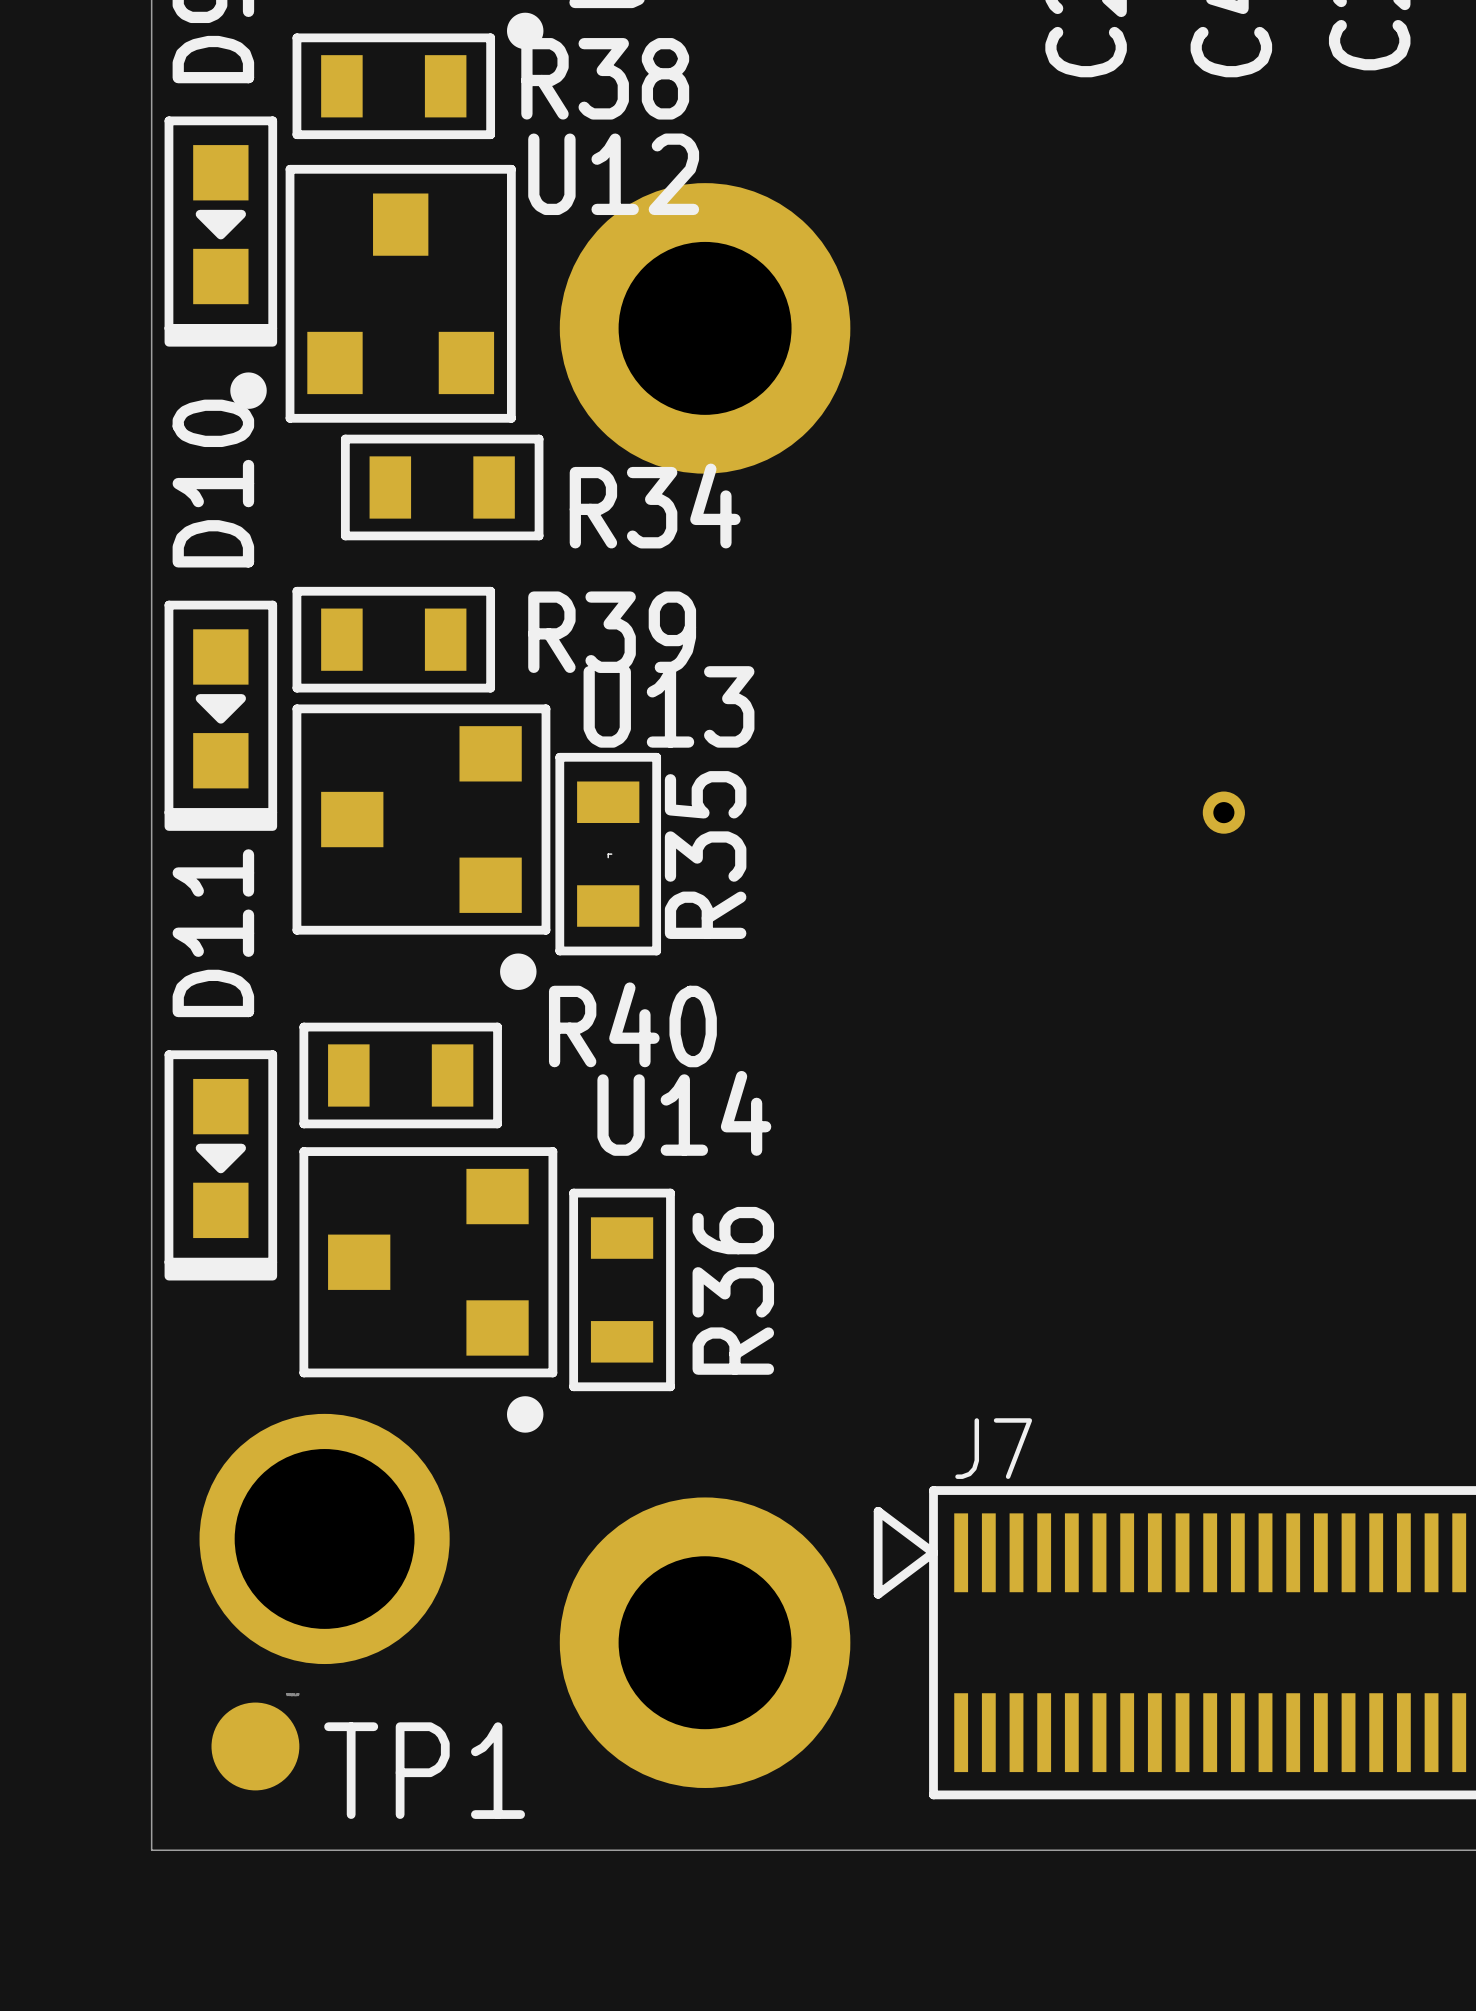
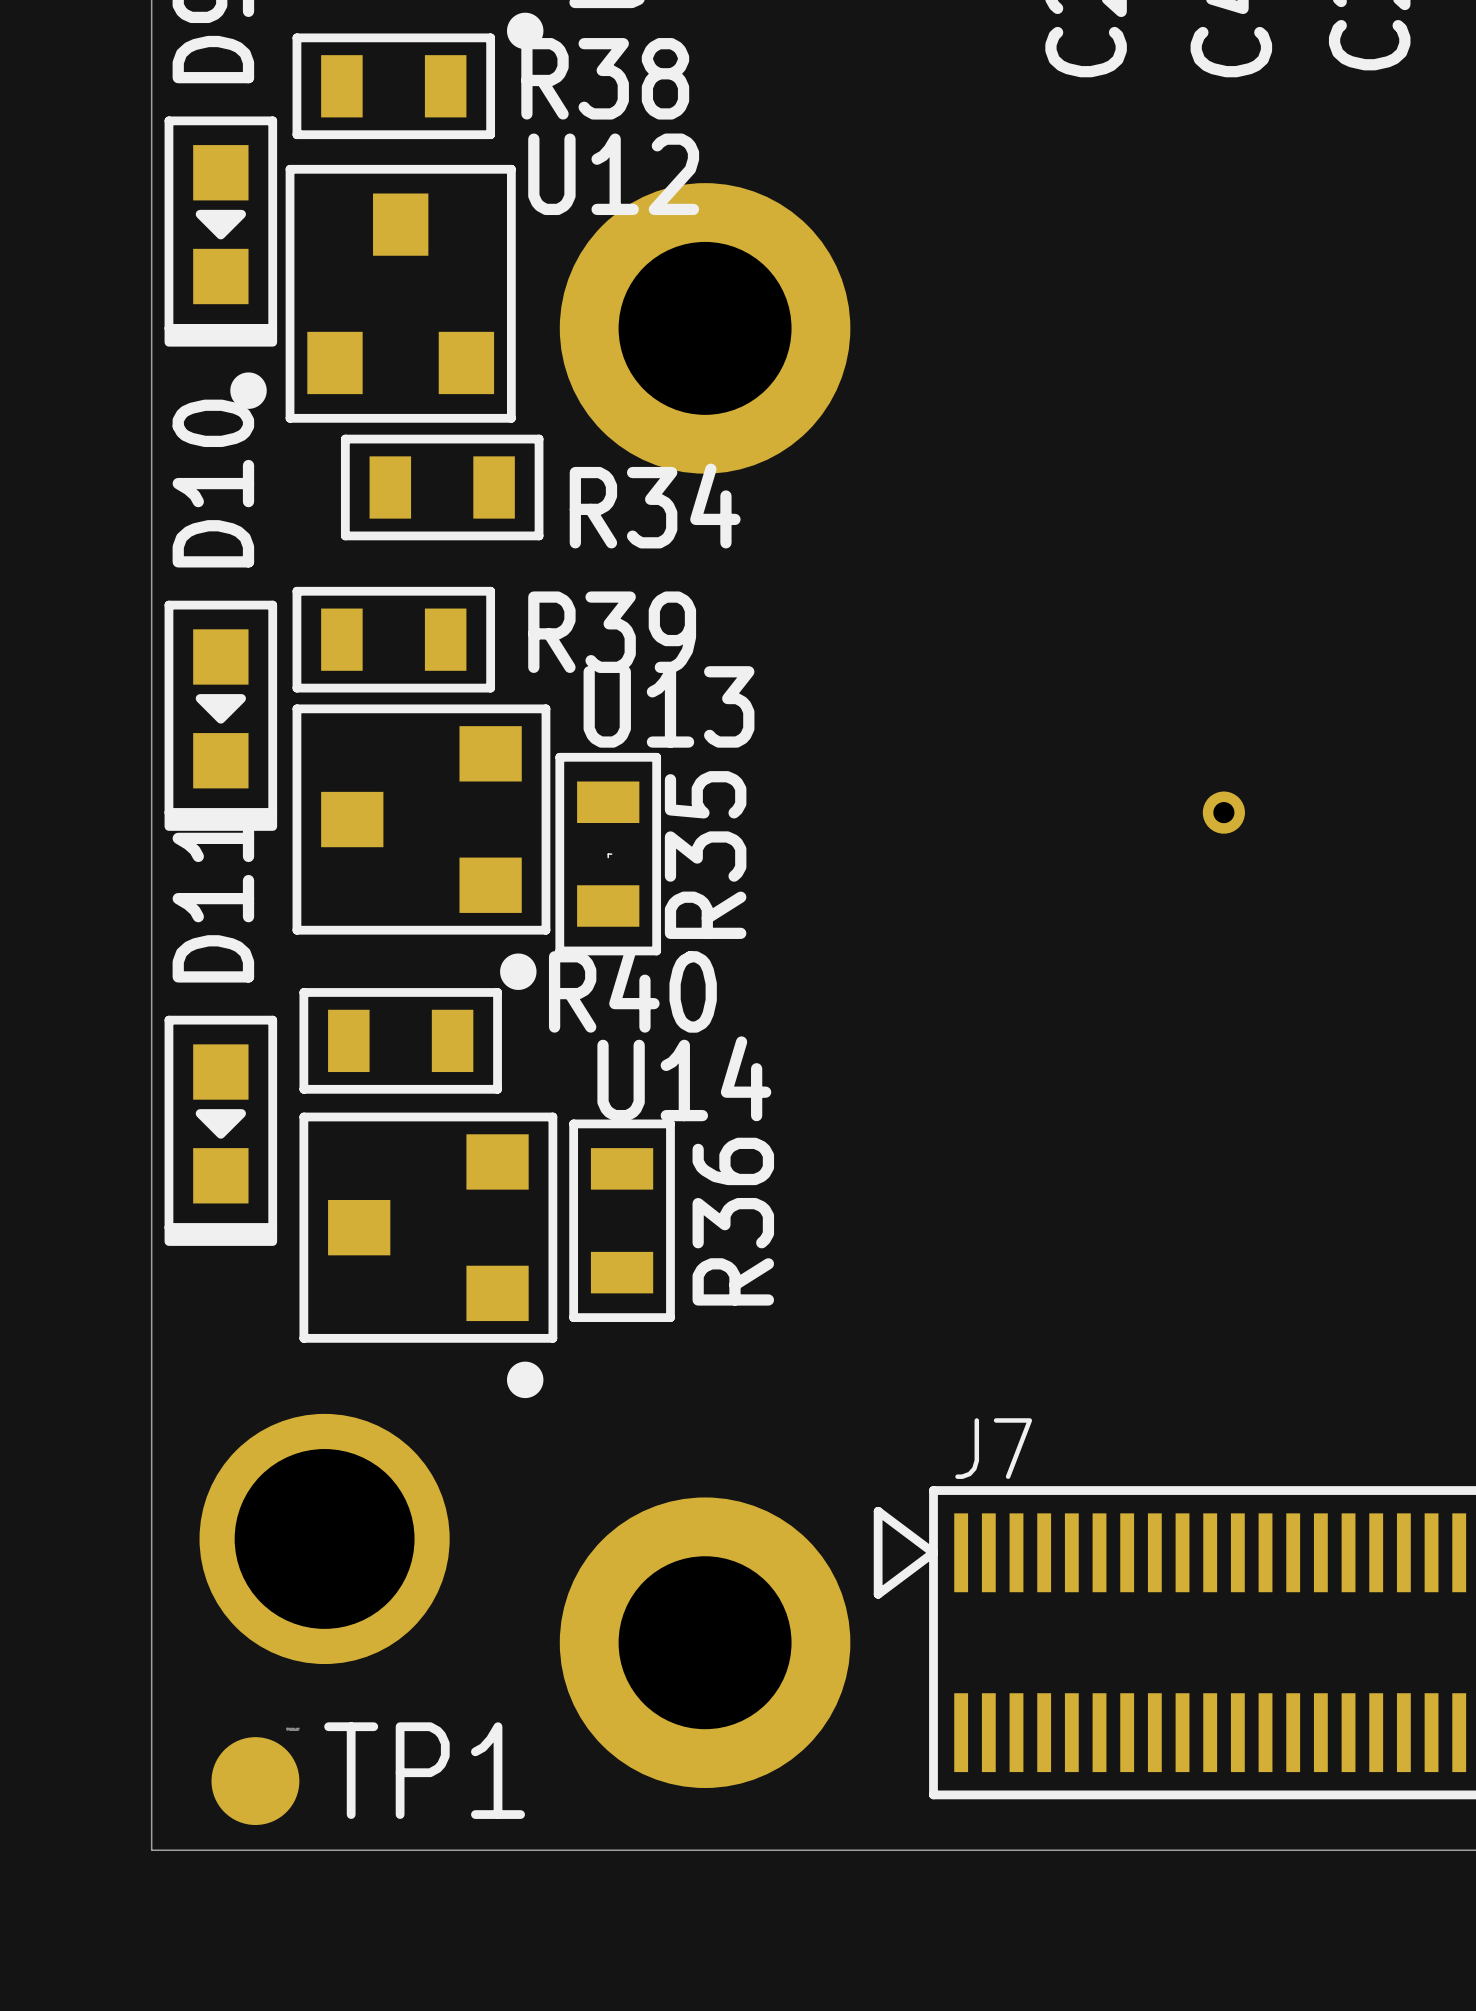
R40 position: (400, 1075) -> (400, 1040)
D11 position: (220, 1165) -> (220, 1130)
U14 position: (428, 1289) -> (428, 1255)
R36 position: (622, 1289) -> (622, 1220)
TP1 position: (255, 1746) -> (255, 1781)

